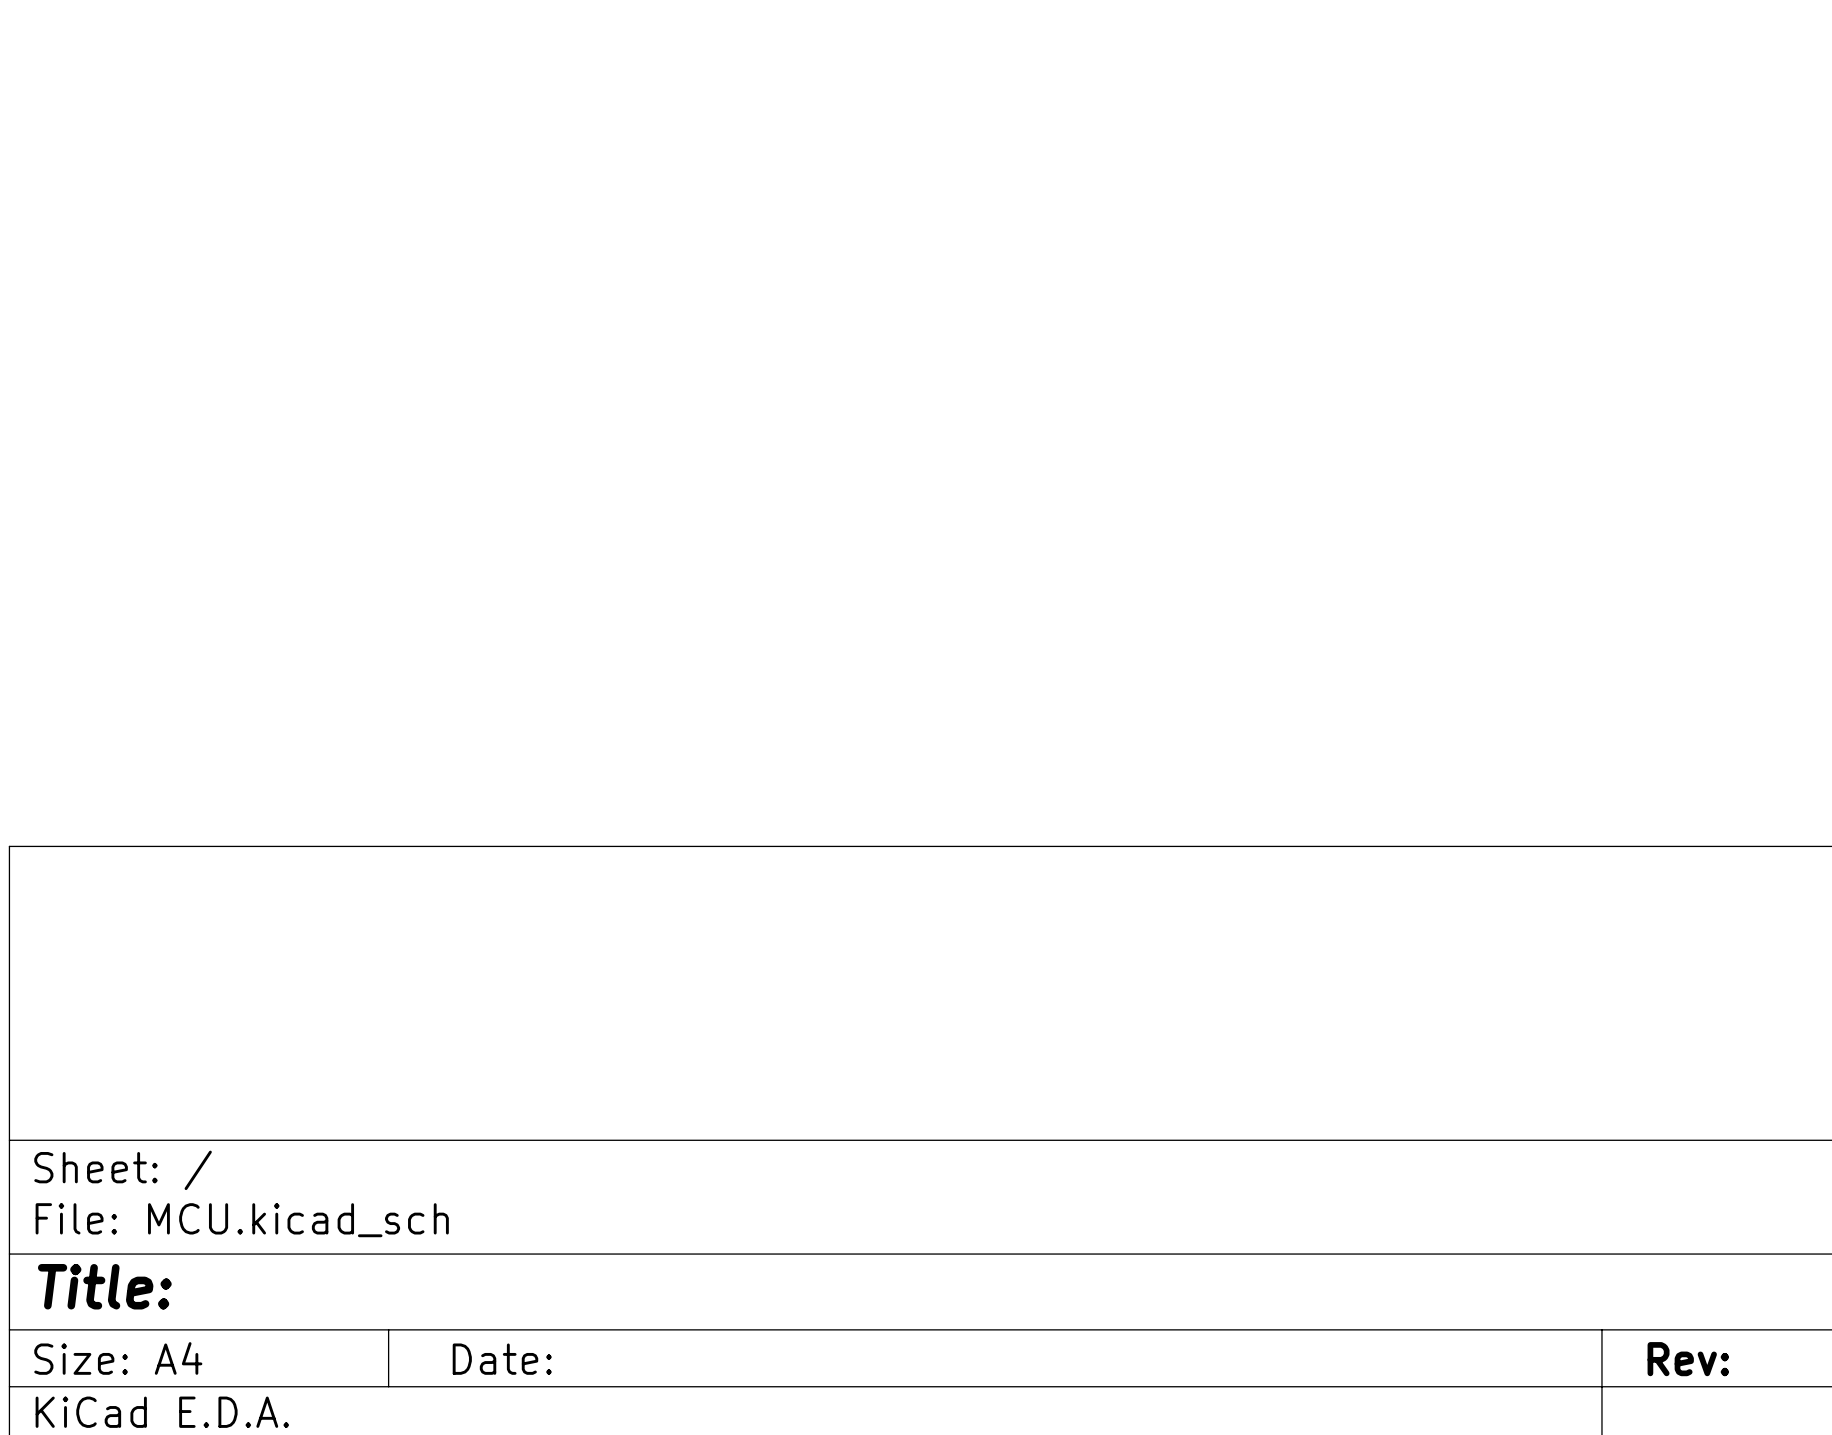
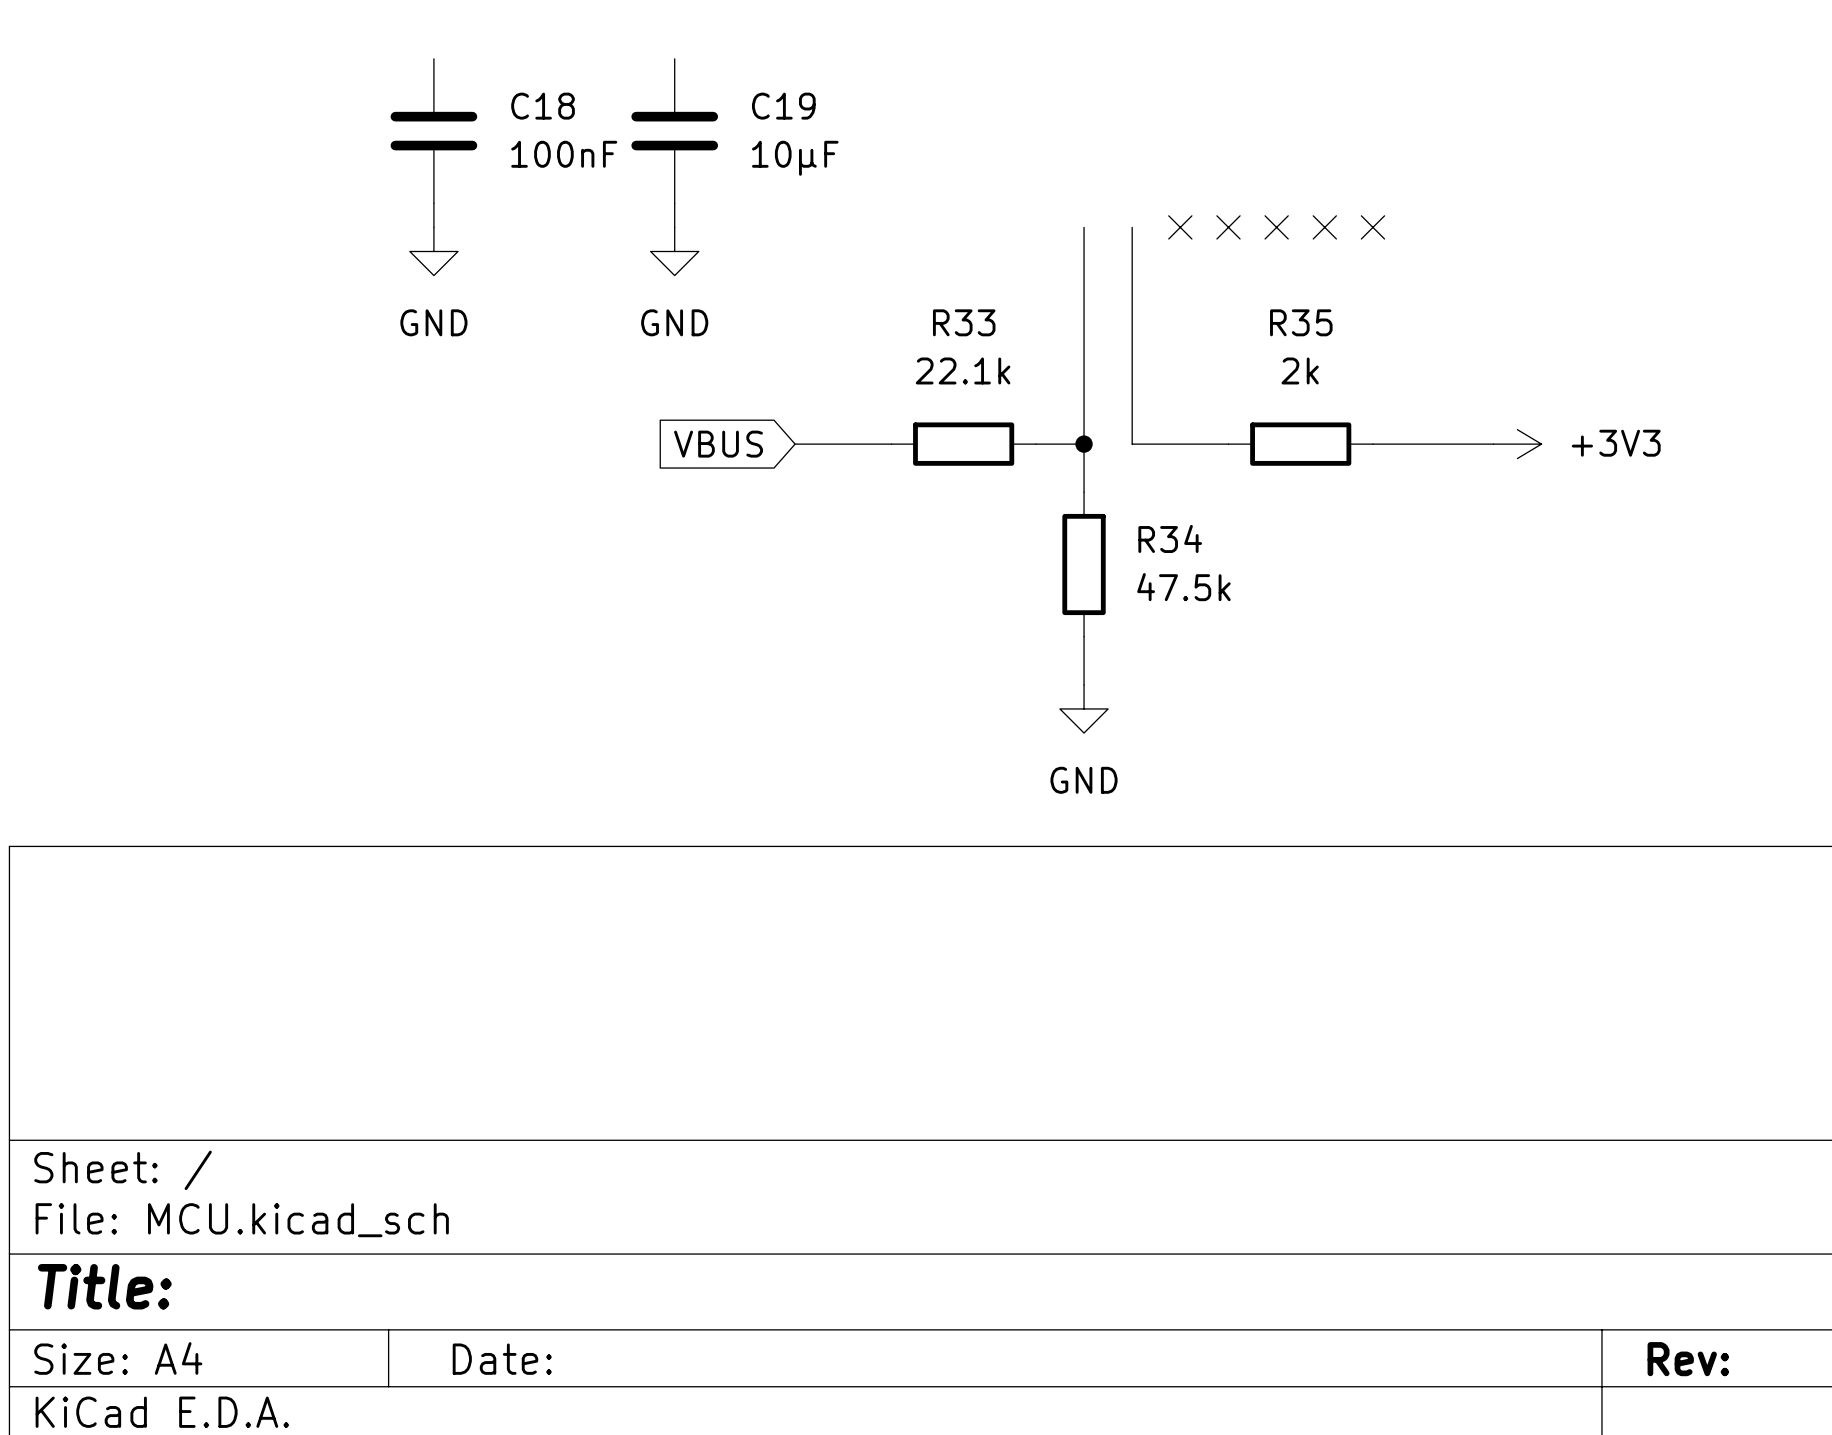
C18: none -> 100nF (433, 131)
C19: none -> 10μF (674, 131)
wire: none -> (433, 203) (433, 227)
wire: none -> (674, 203) (674, 227)
wire: none -> (1084, 227) (1084, 492)
wire: none -> (1132, 227) (1132, 444) (1228, 444)
no-connect mark: none -> (1180, 227)
no-connect mark: none -> (1228, 227)
no-connect mark: none -> (1276, 227)
no-connect mark: none -> (1324, 227)
no-connect mark: none -> (1372, 227)
power symbol: none -> GND (433, 251)
power symbol: none -> GND (674, 251)
global label: none -> VBUS (718, 444)
wire: none -> (795, 444) (891, 444)
R33: none -> 22.1k (963, 444)
wire: none -> (1035, 444) (1084, 444)
junction: none -> (1084, 444)
R35: none -> 2k (1300, 444)
wire: none -> (1372, 444) (1493, 444)
power symbol: none -> +3V3 (1517, 444)
R34: none -> 47.5k (1084, 564)
wire: none -> (1084, 636) (1084, 684)
power symbol: none -> GND (1084, 708)

